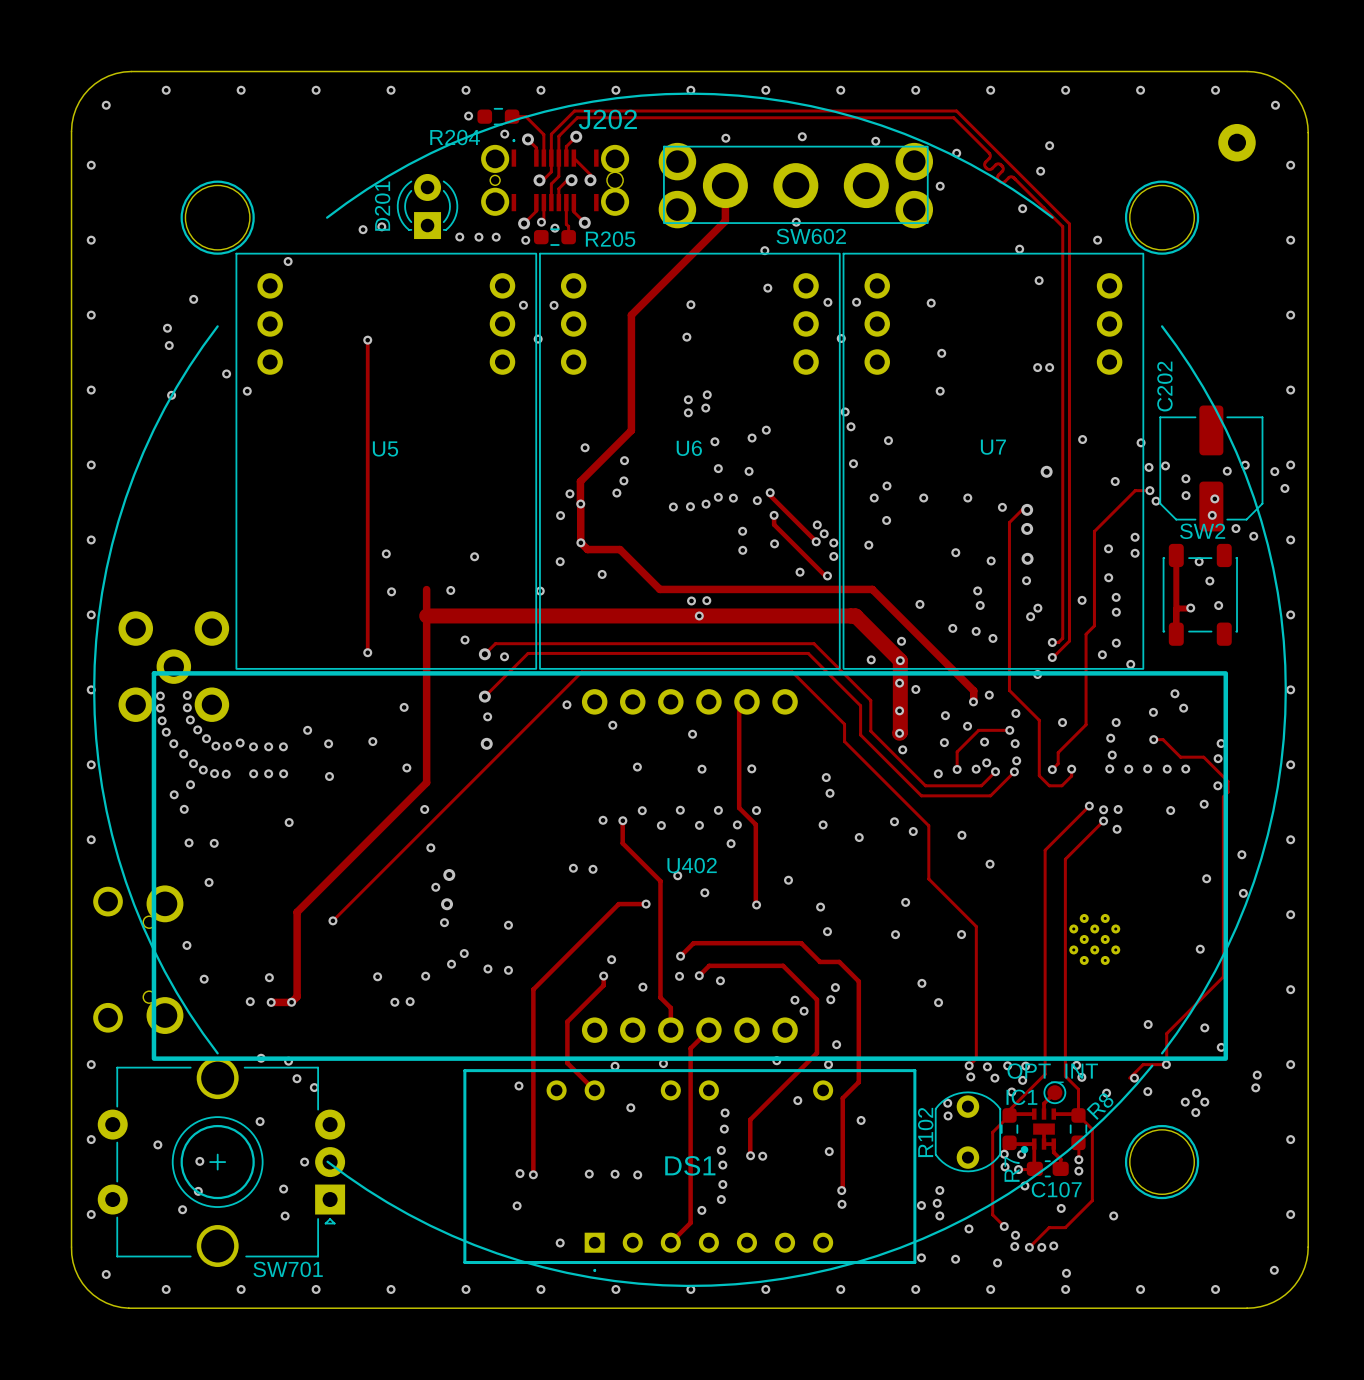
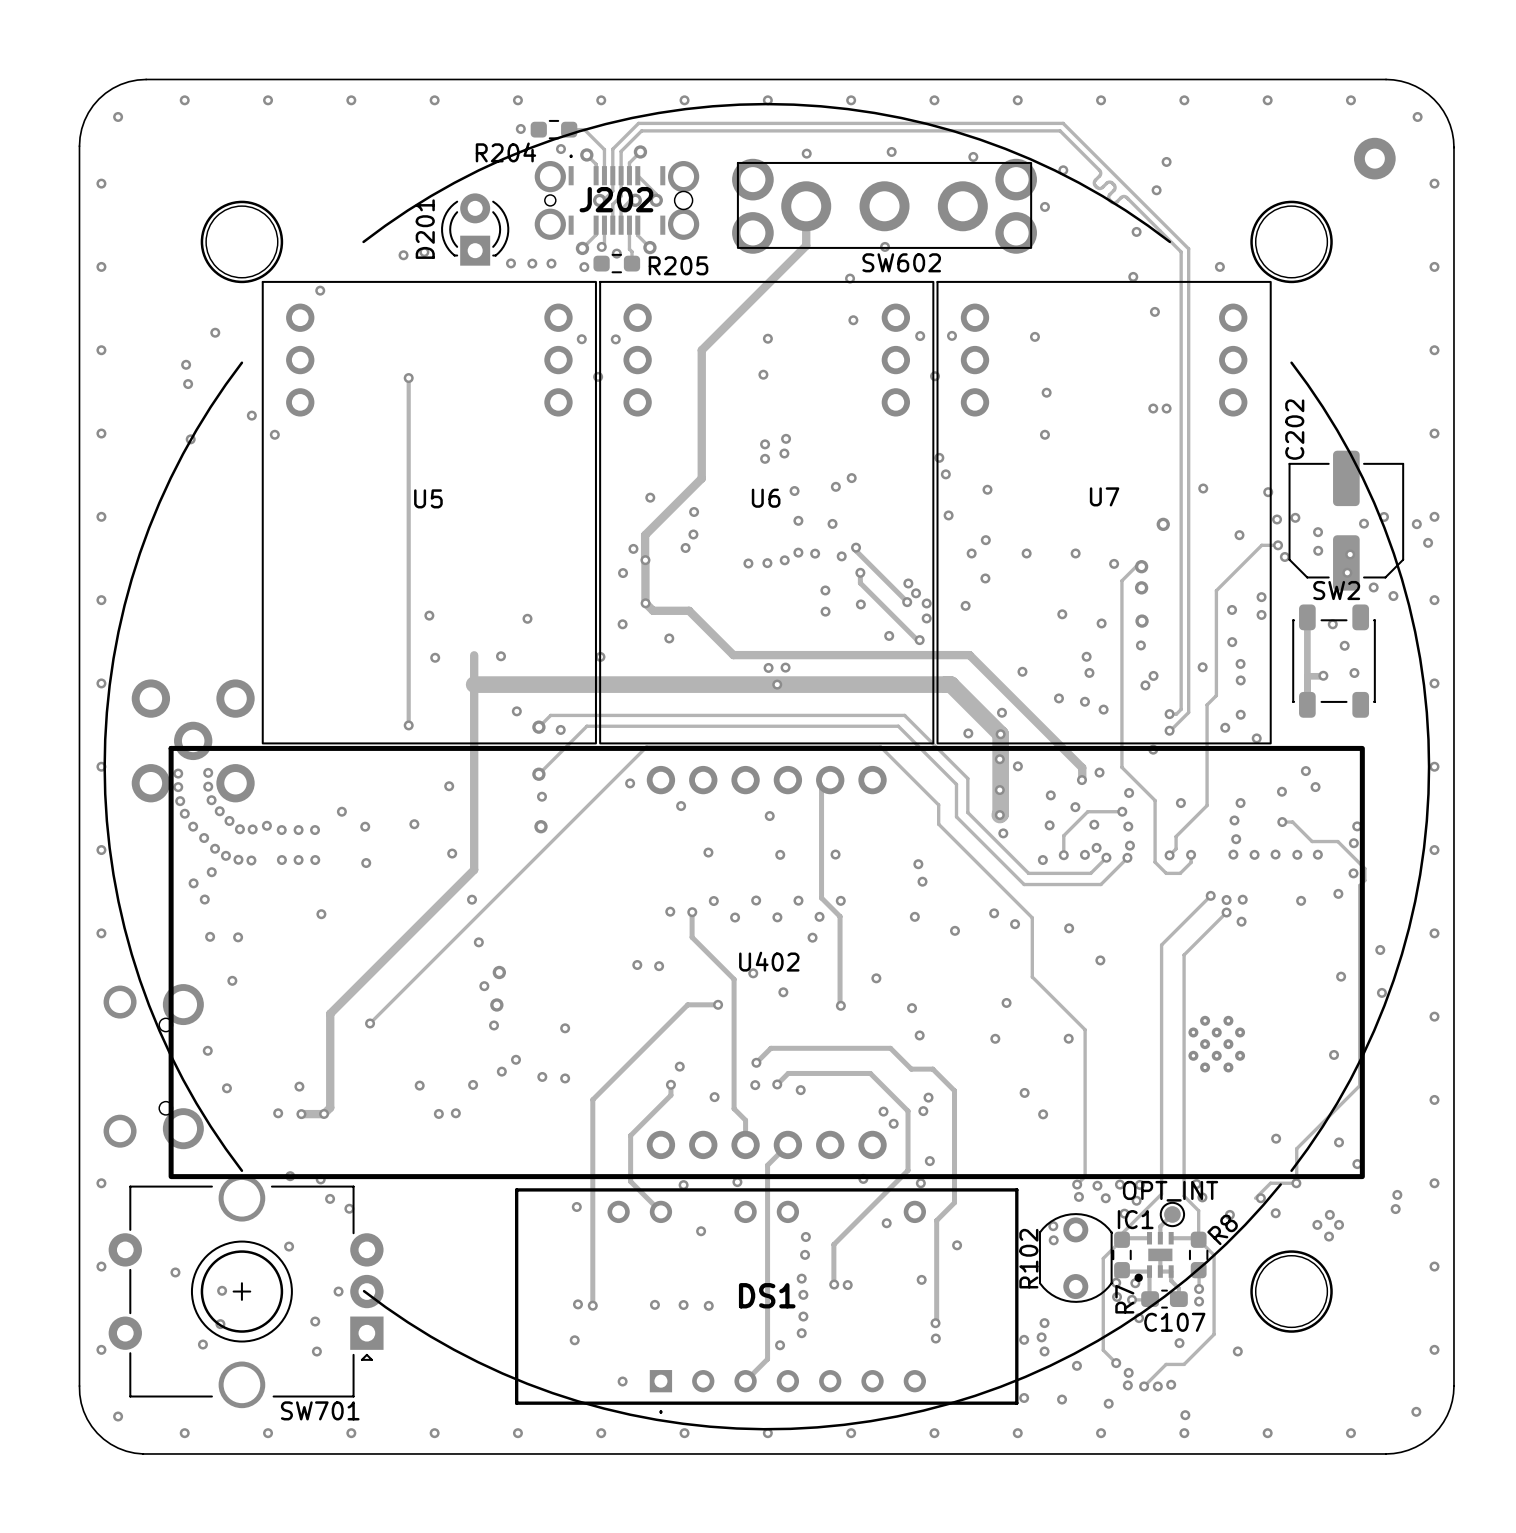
J202 name position: J202 (607, 119) -> J202 (616, 199)

